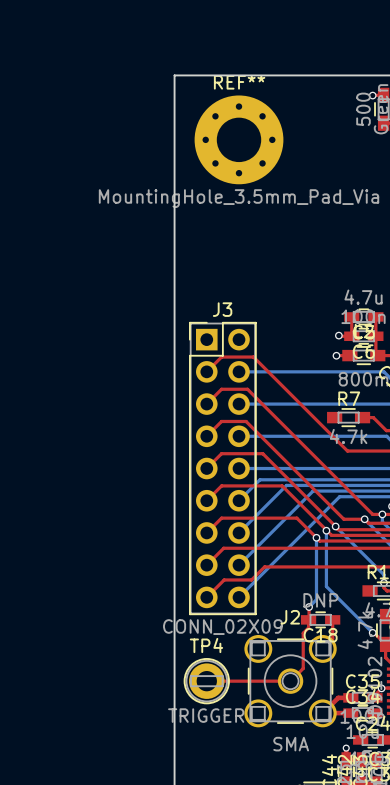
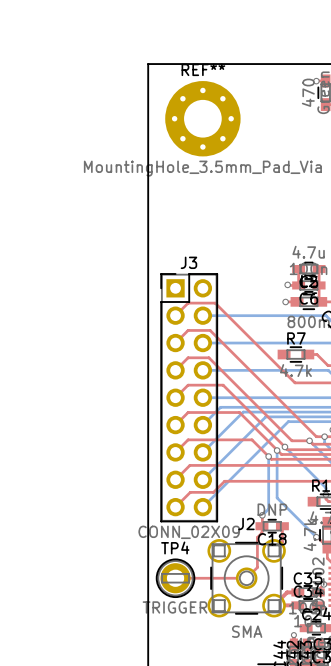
part value: 500 (363, 109) -> 470 (308, 92)

